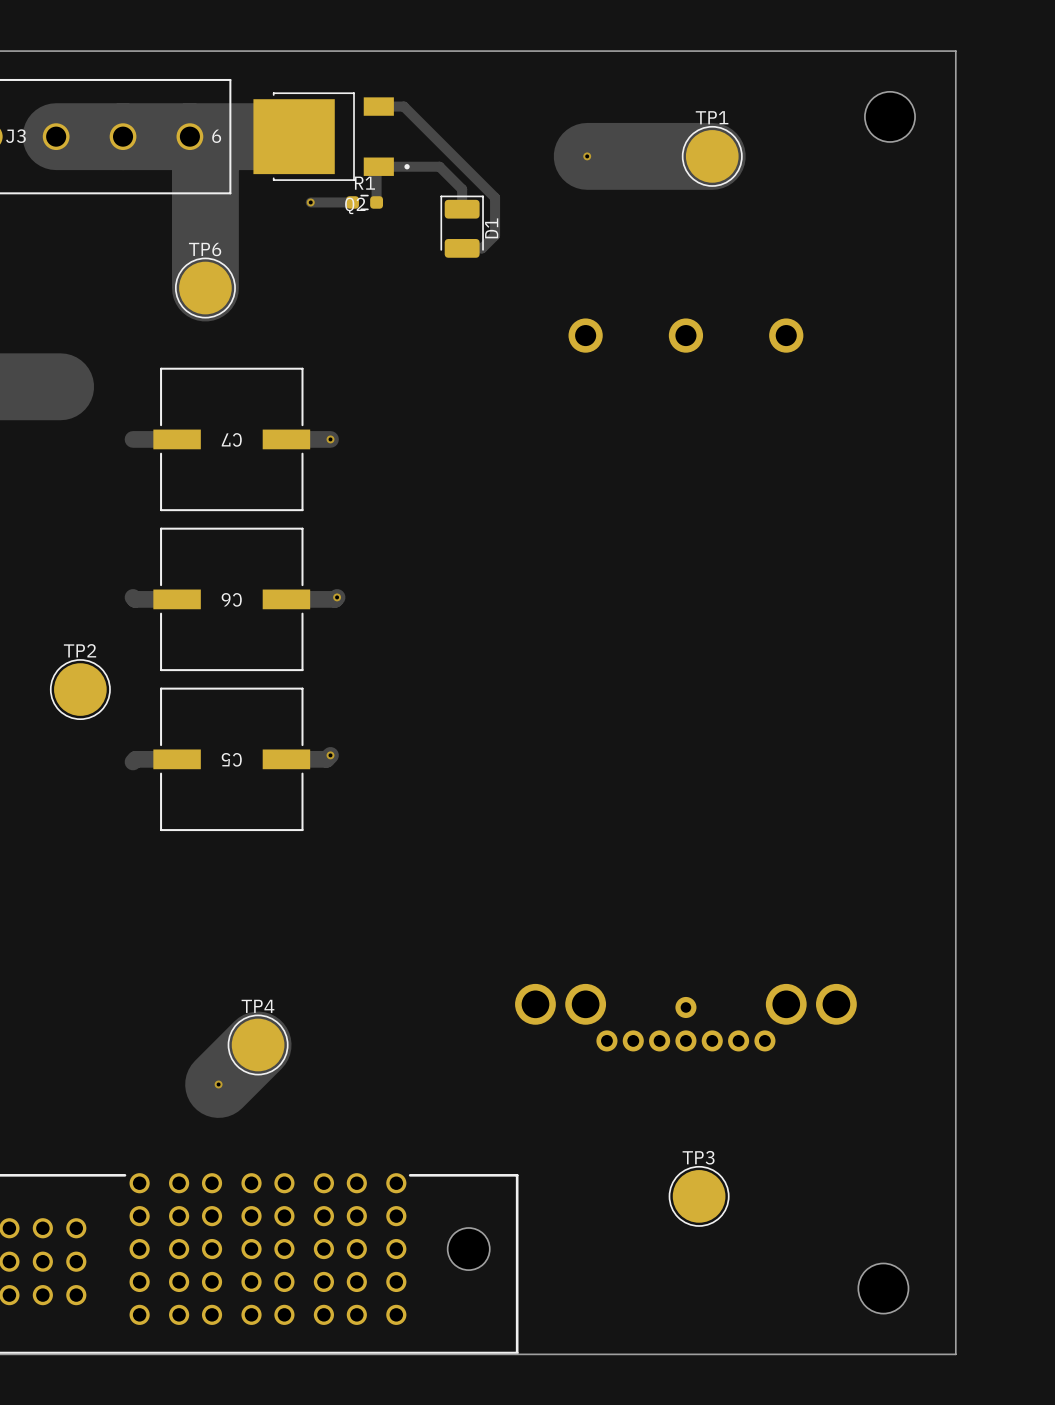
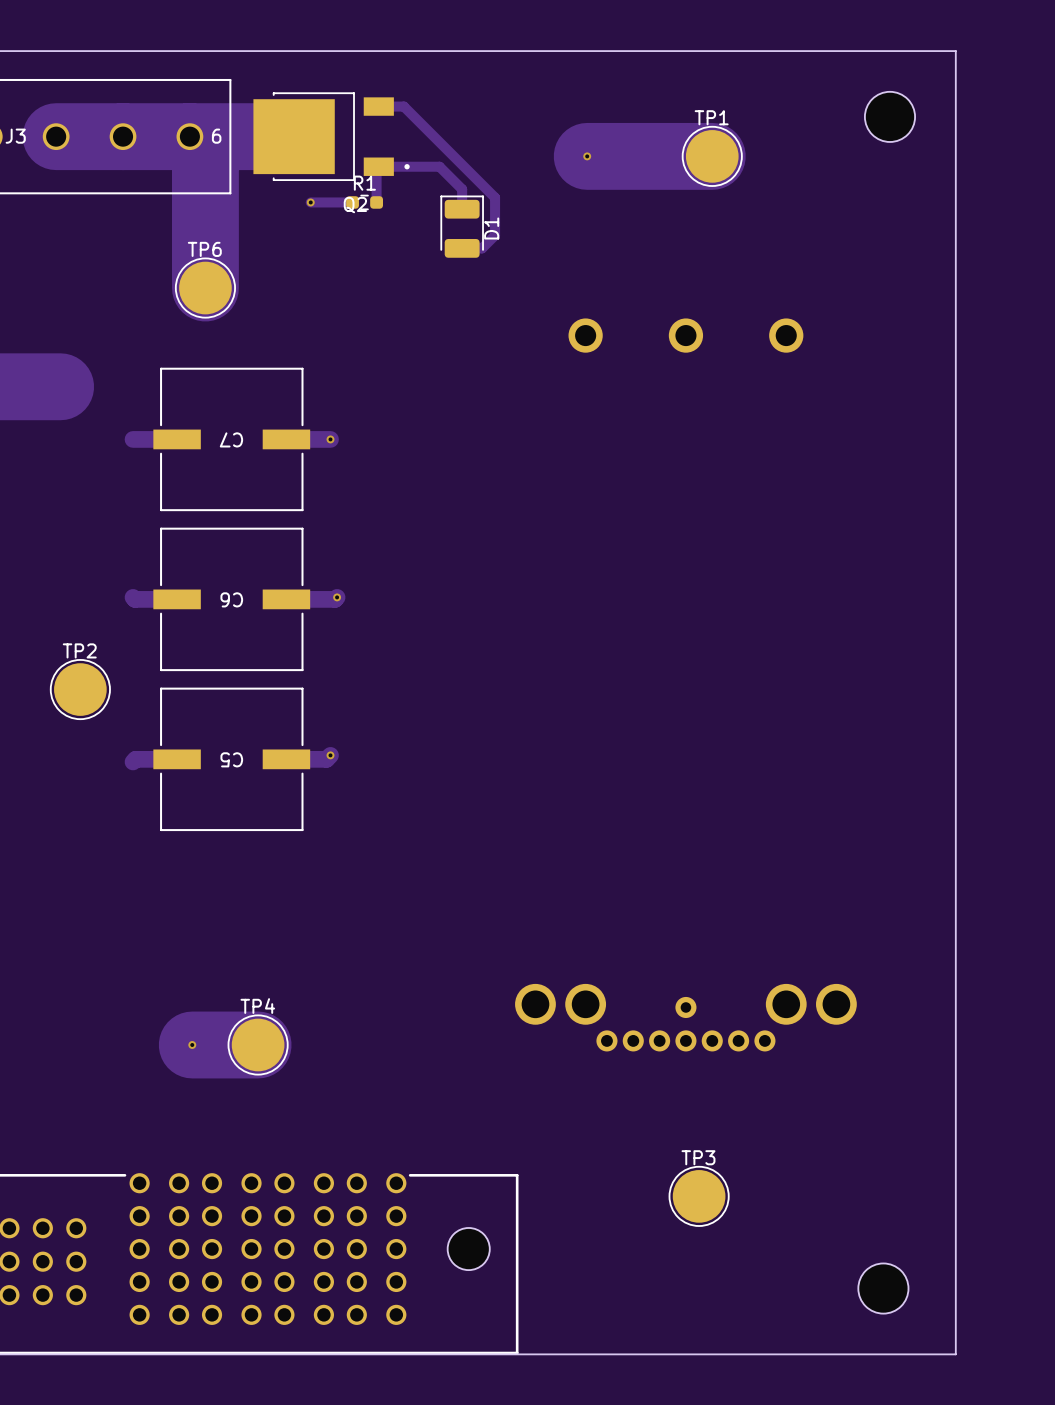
track: (258, 1044) (218, 1084) -> (258, 1044) (192, 1044)
via position: (218, 1084) -> (192, 1044)

